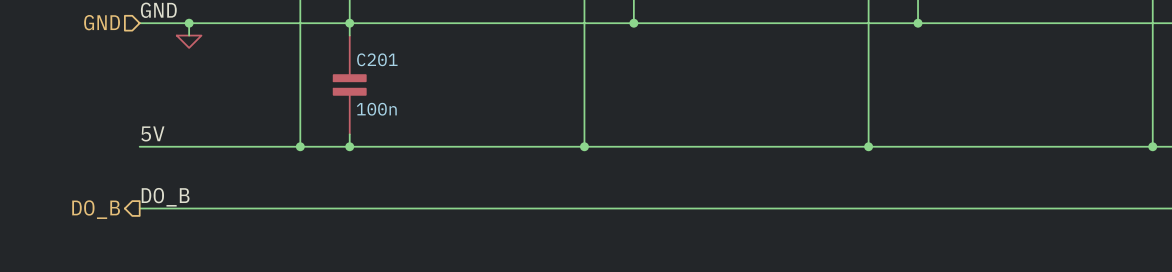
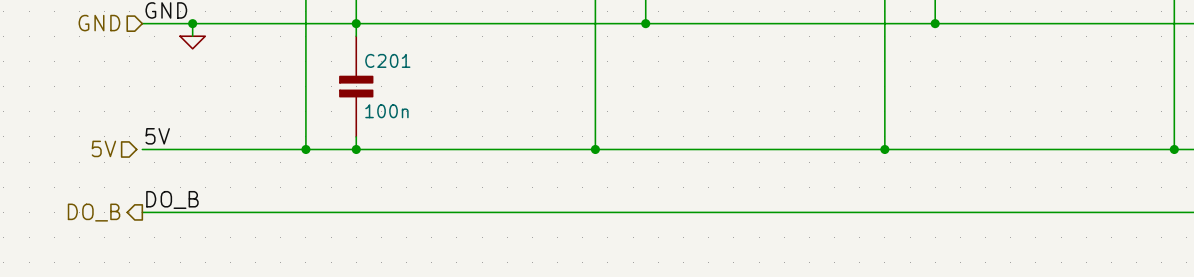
hierarchical label: none -> 5V (103, 148)

